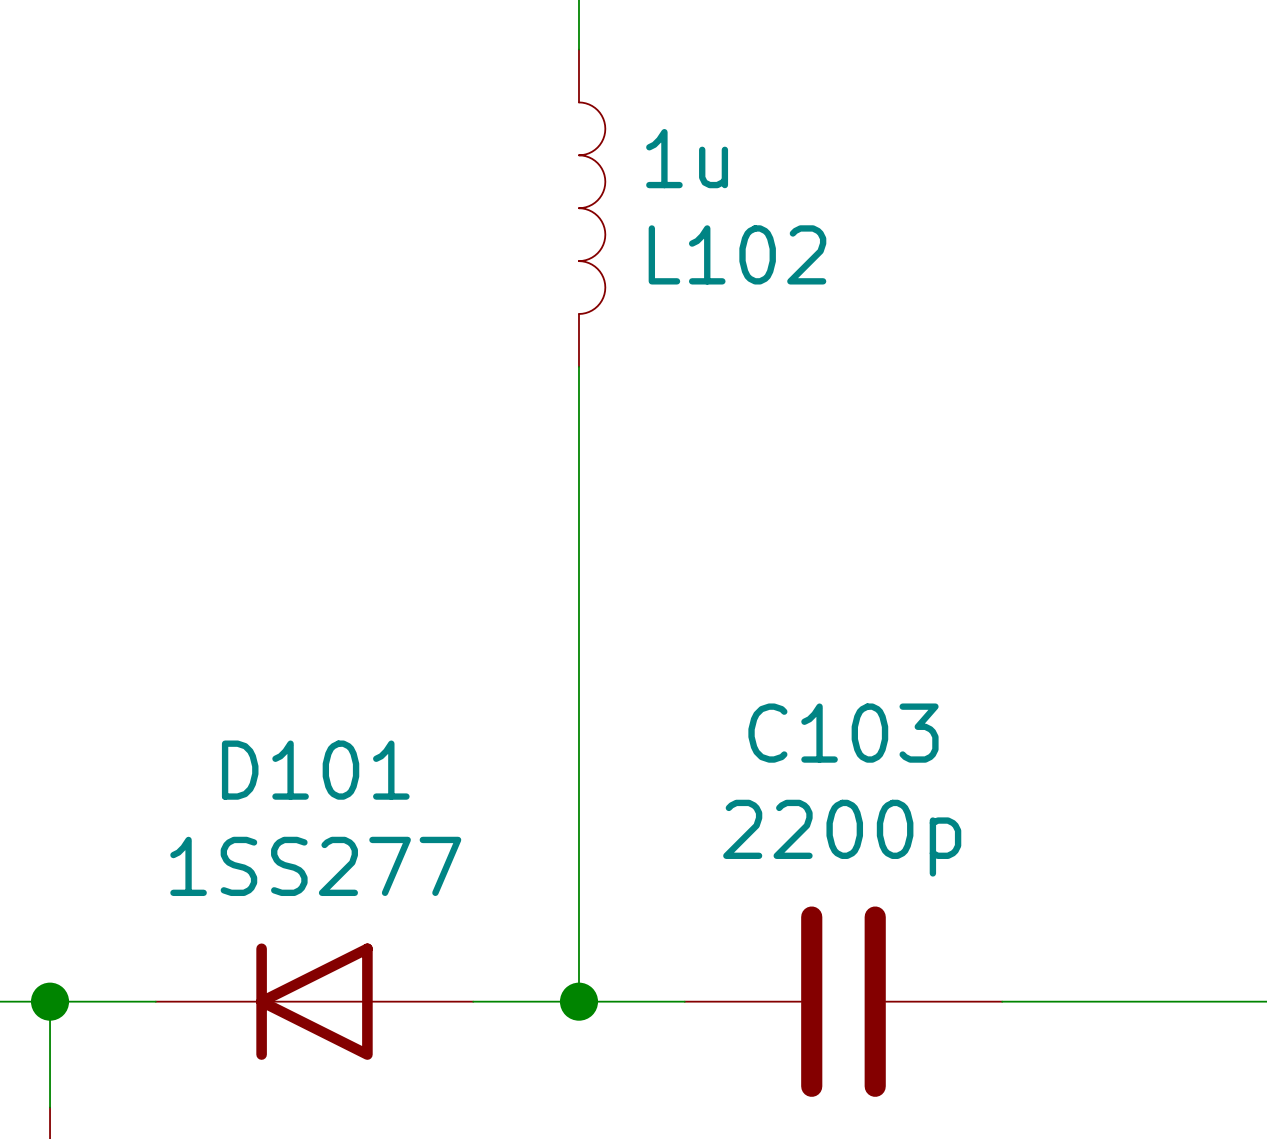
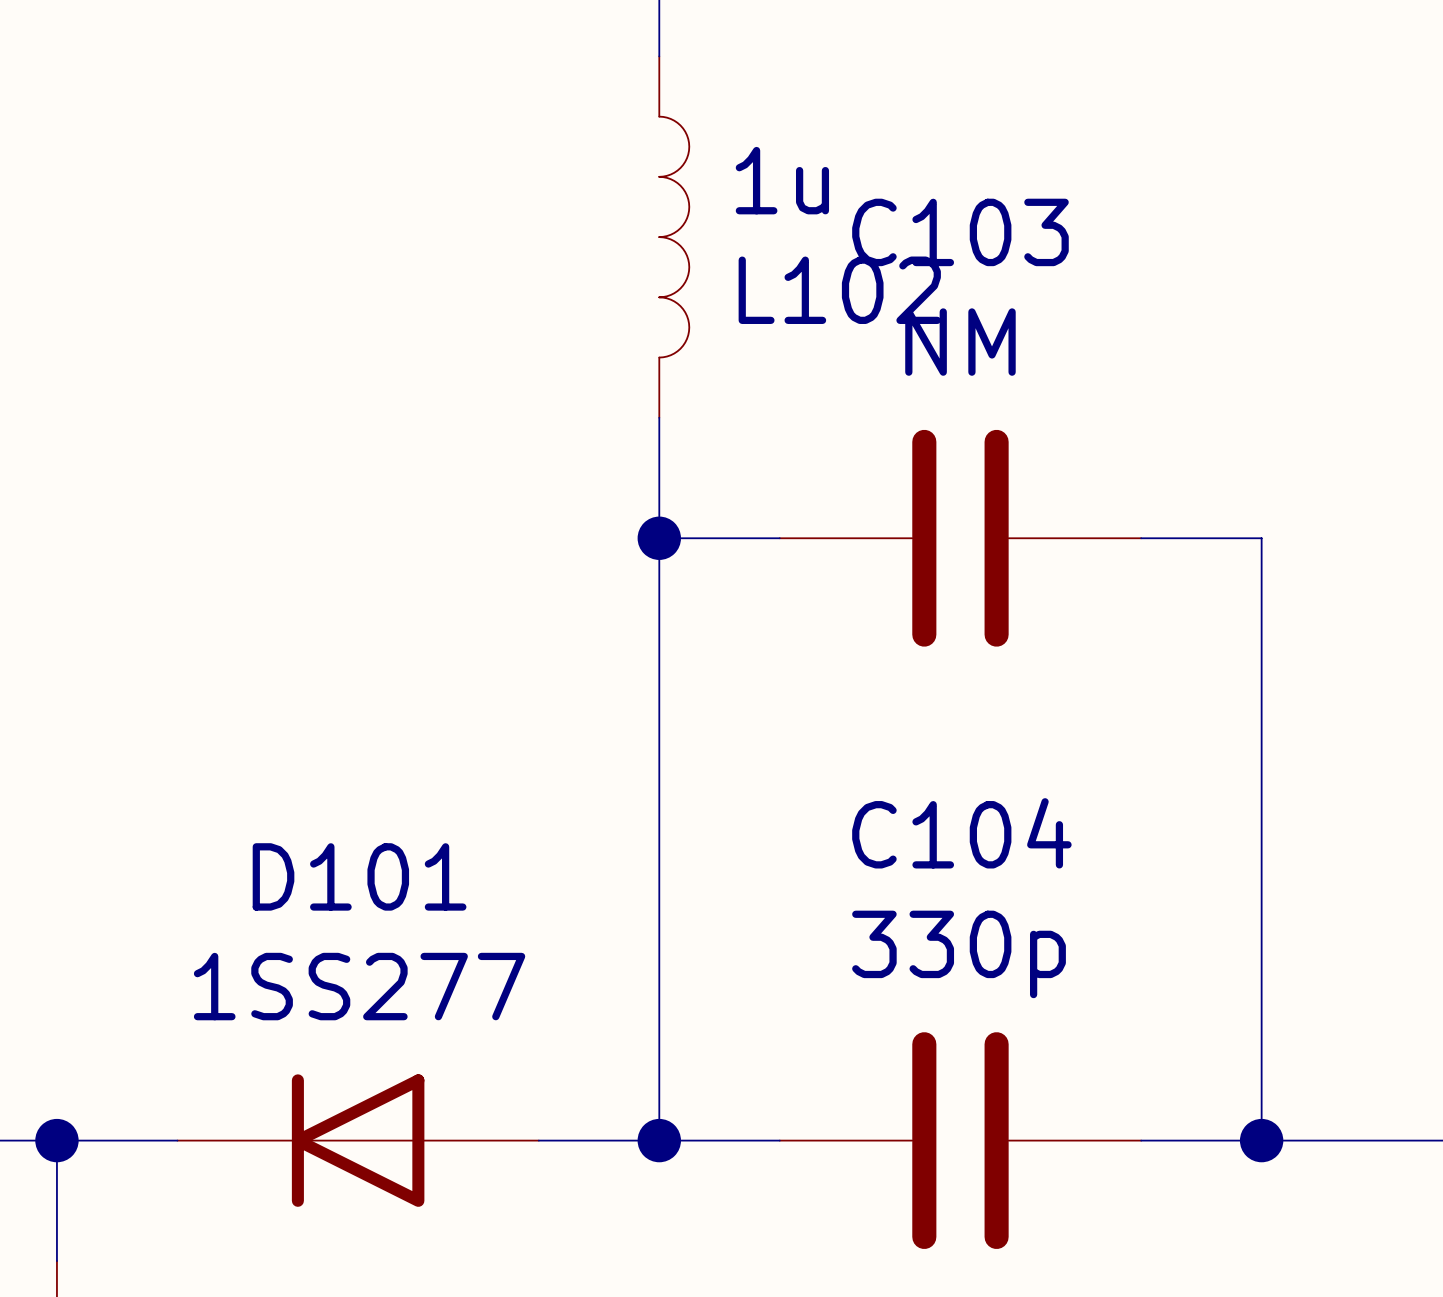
wire: none -> (659, 538) (779, 538)
junction: none -> (659, 538)
C103: none -> NM (960, 538)
wire: none -> (1141, 538) (1261, 538) (1261, 1140)
C103 name: C103 (843, 733) -> C104 (961, 833)
C103 value: 2200p (842, 838) -> 330p (959, 954)
junction: none -> (1261, 1140)

